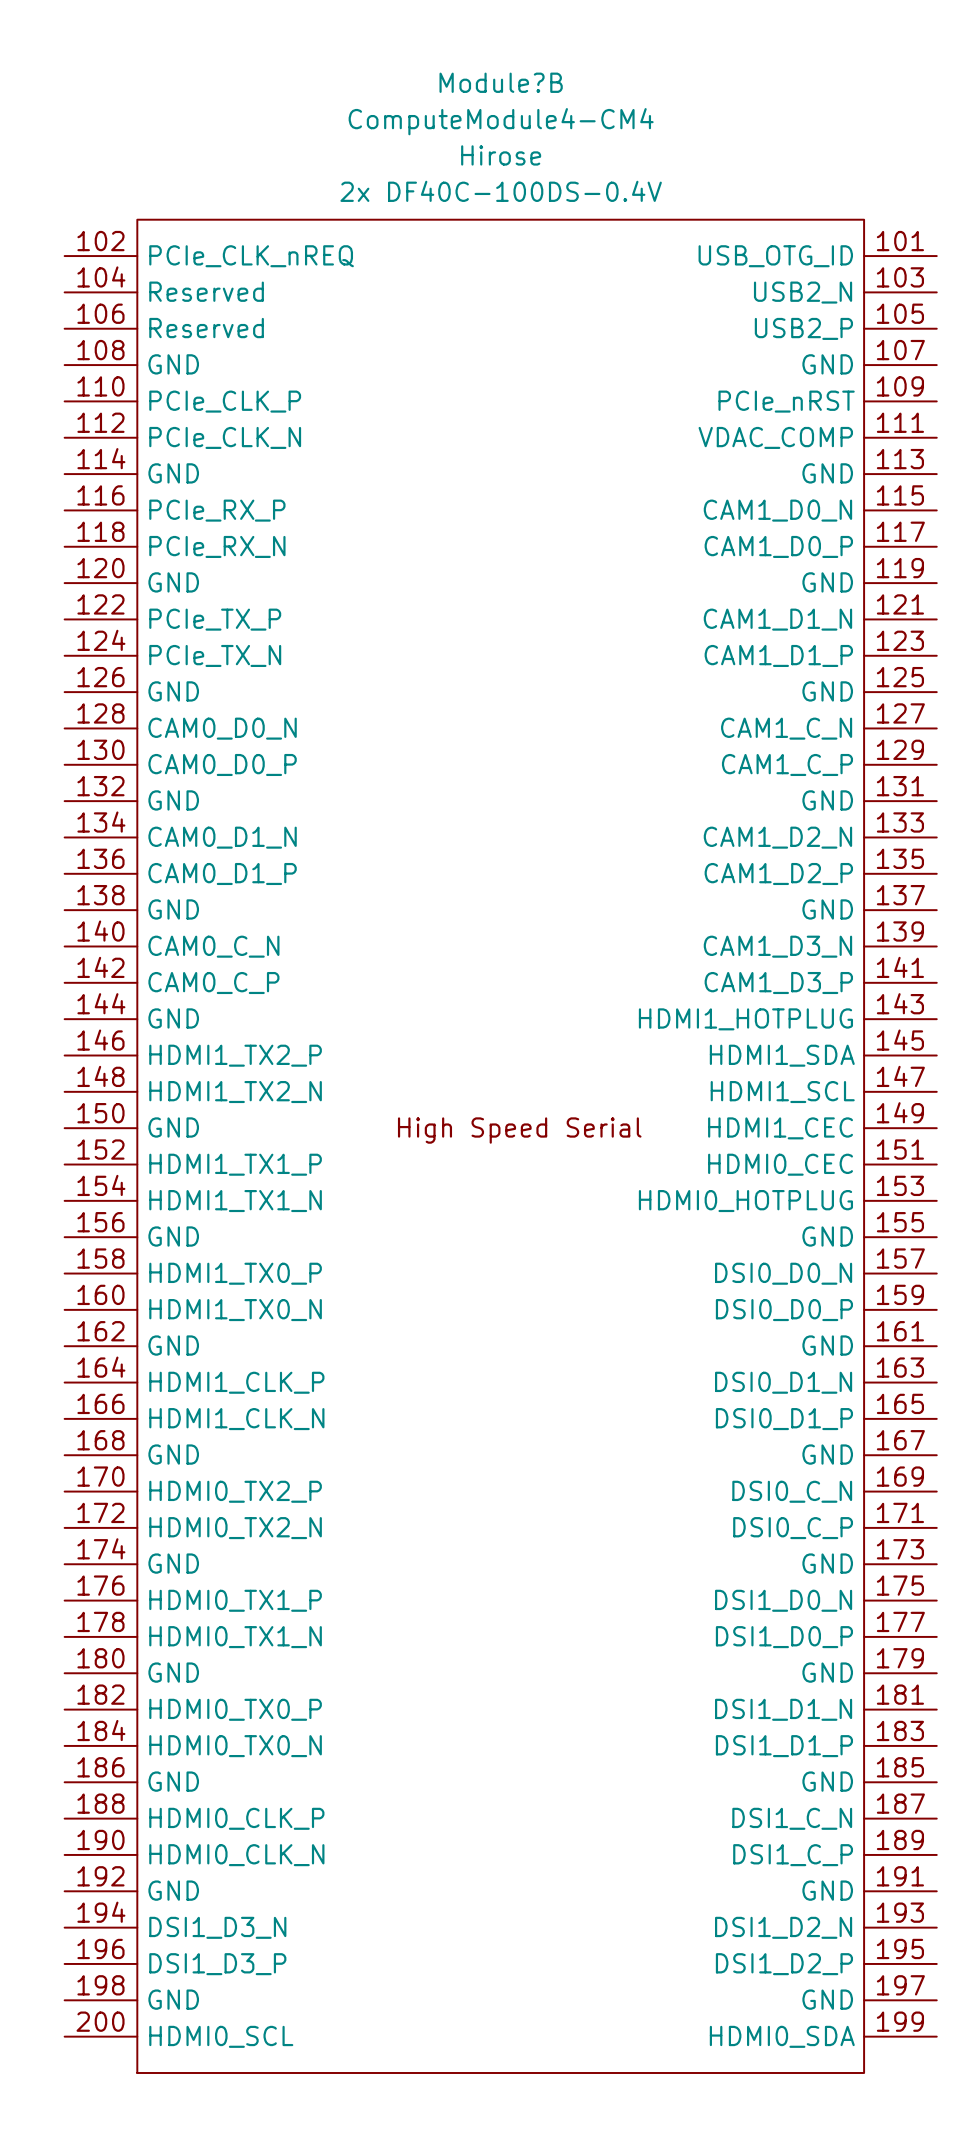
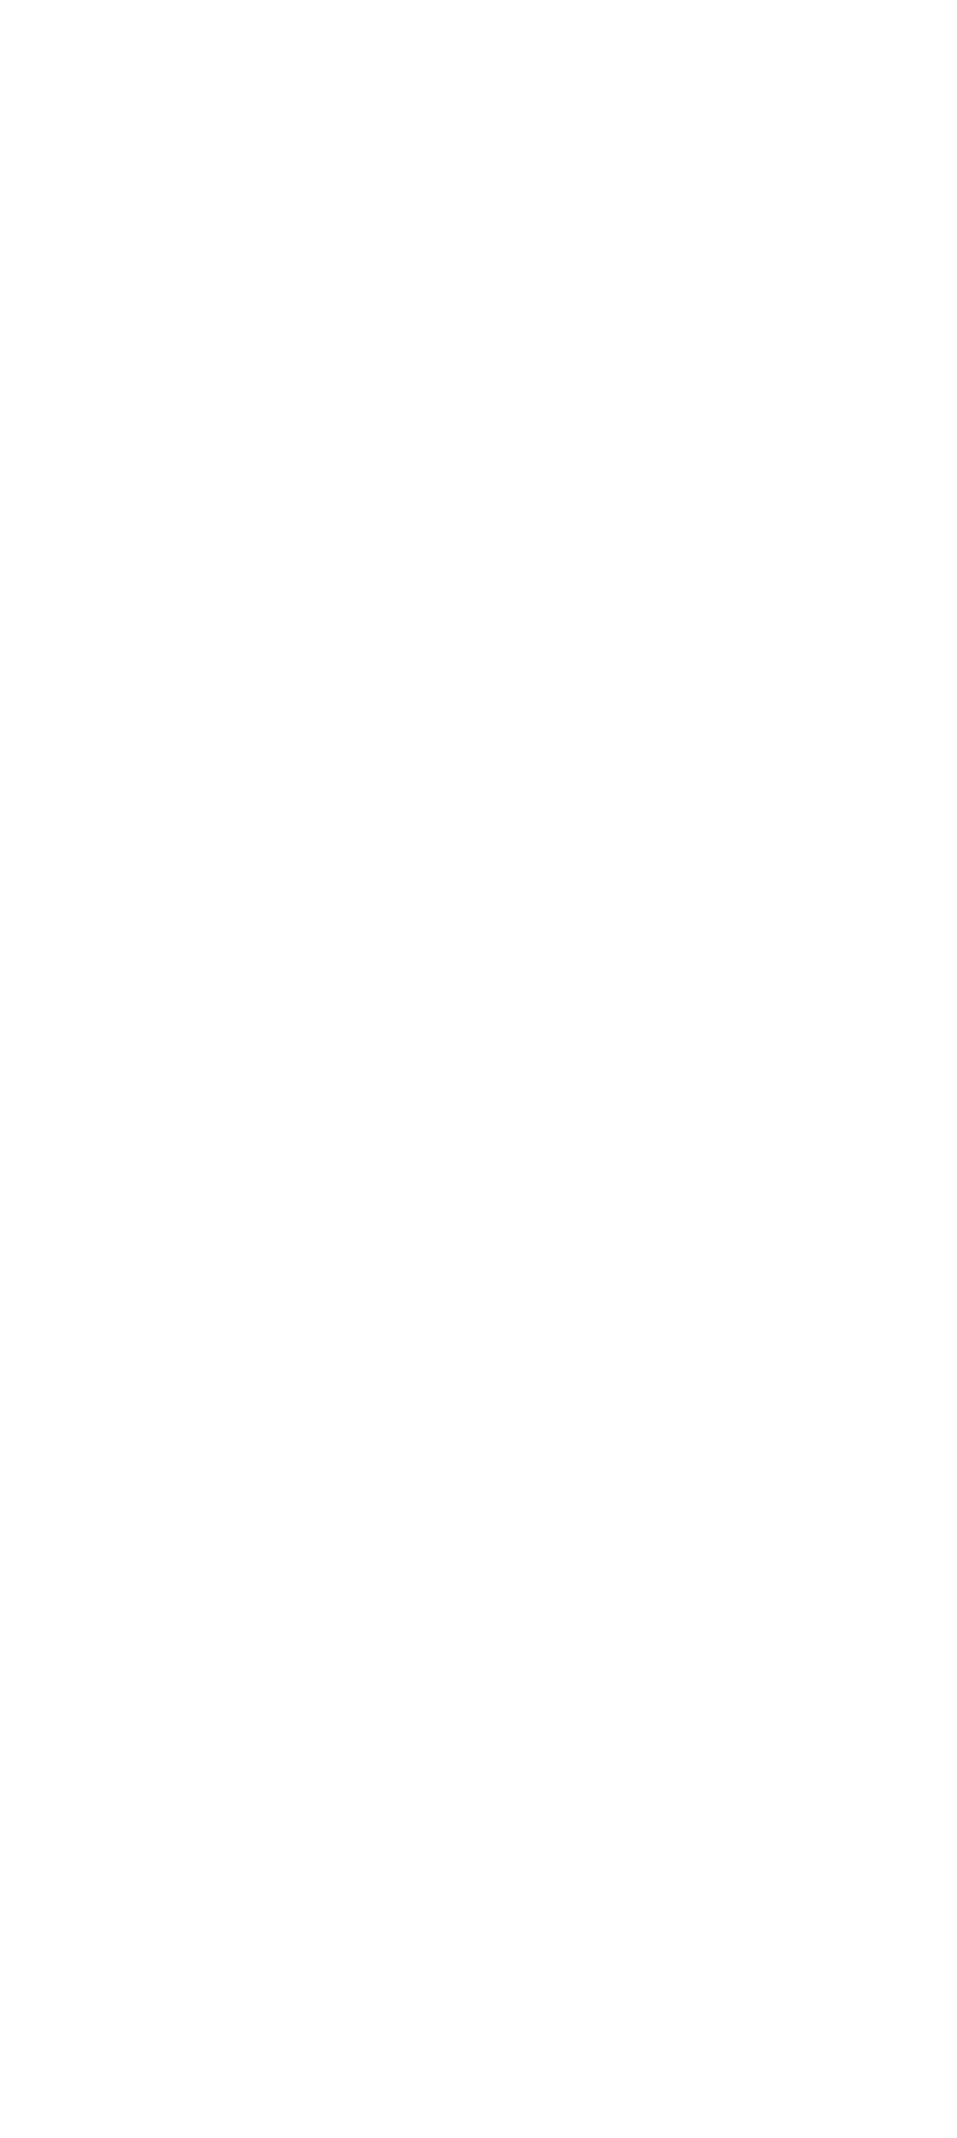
Module?B: ComputeModule4-CM4 (500, 1146) -> none

